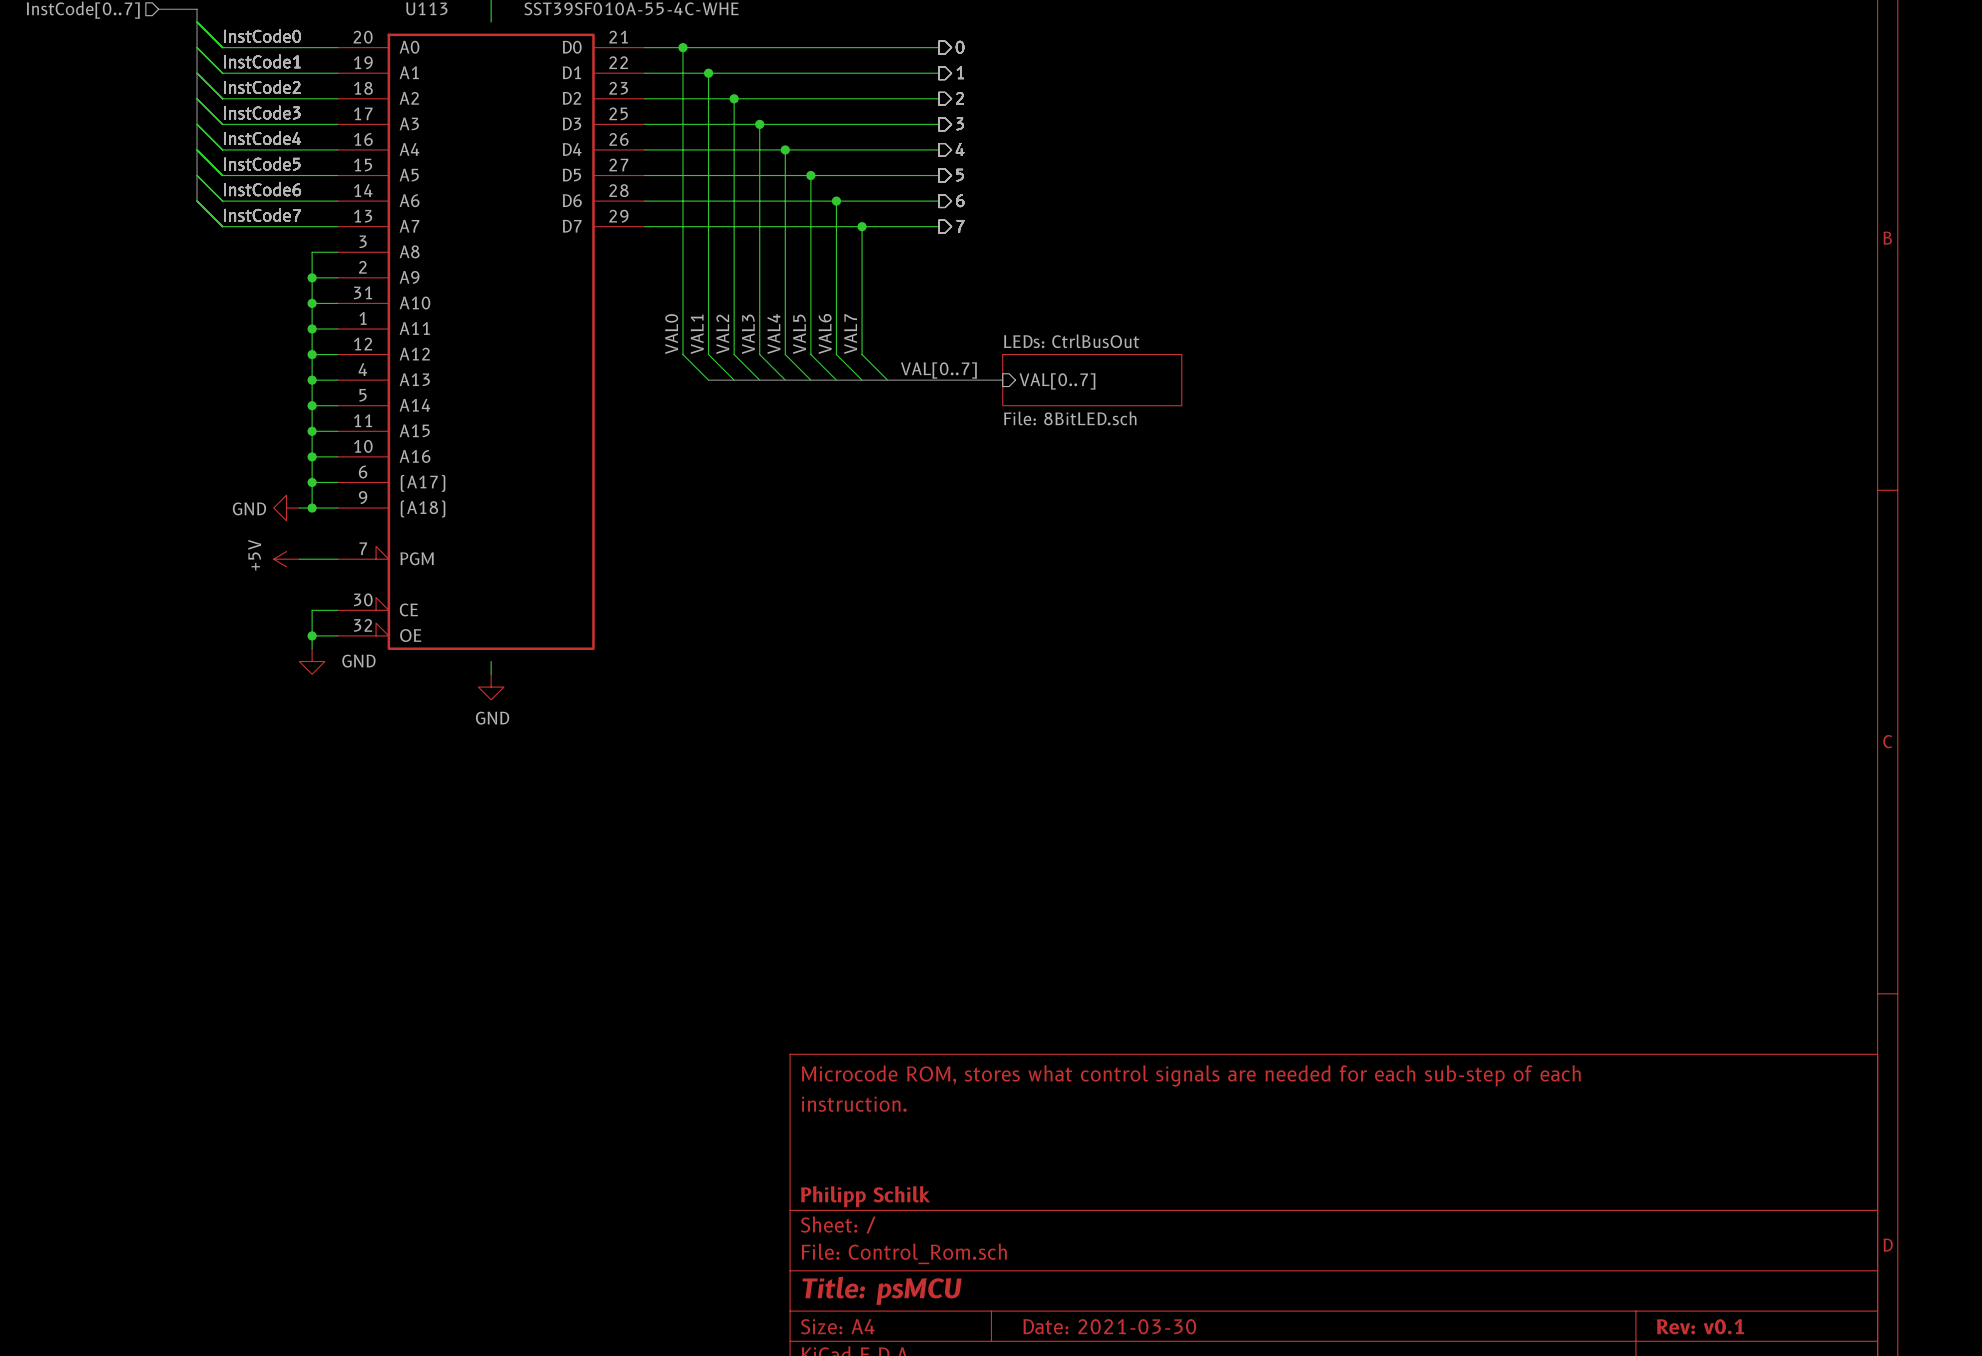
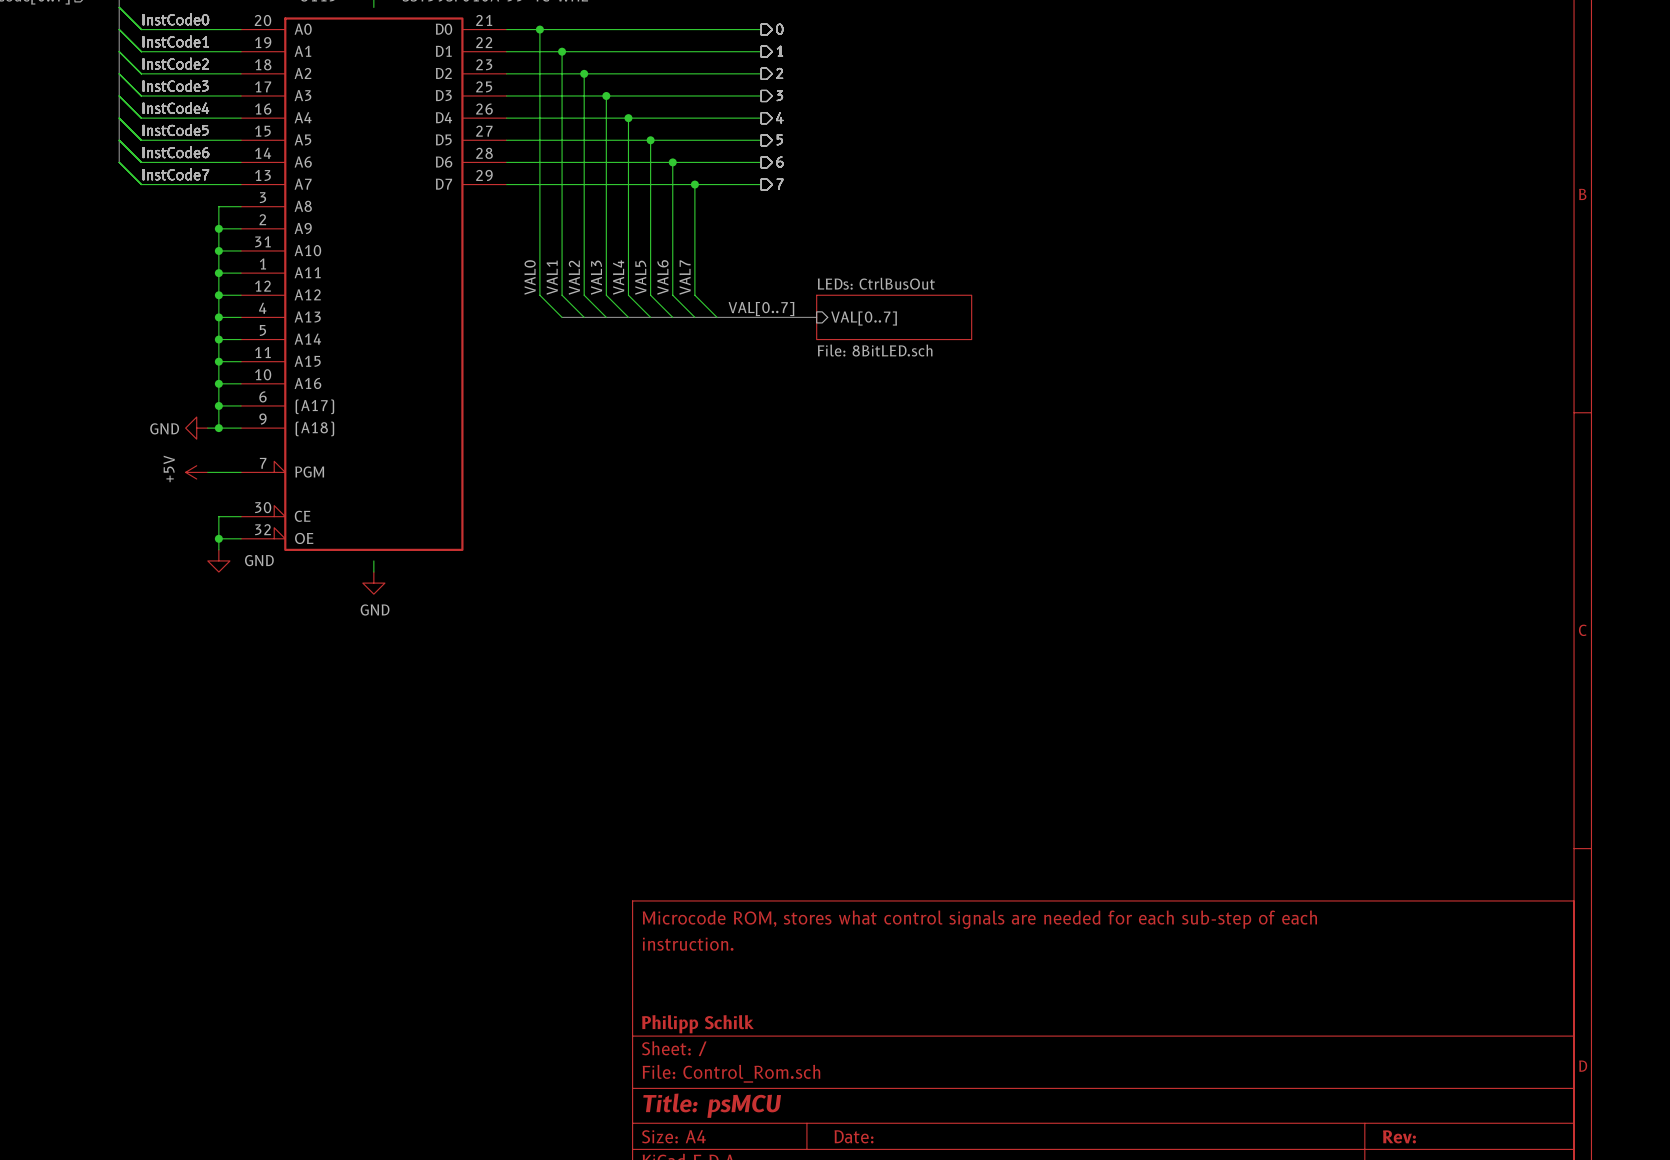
title block: Date: 2021-03-30 (1109, 1326) -> Date: (854, 1136)
title block: Rev: v0.1 (1700, 1326) -> Rev: (1399, 1136)

